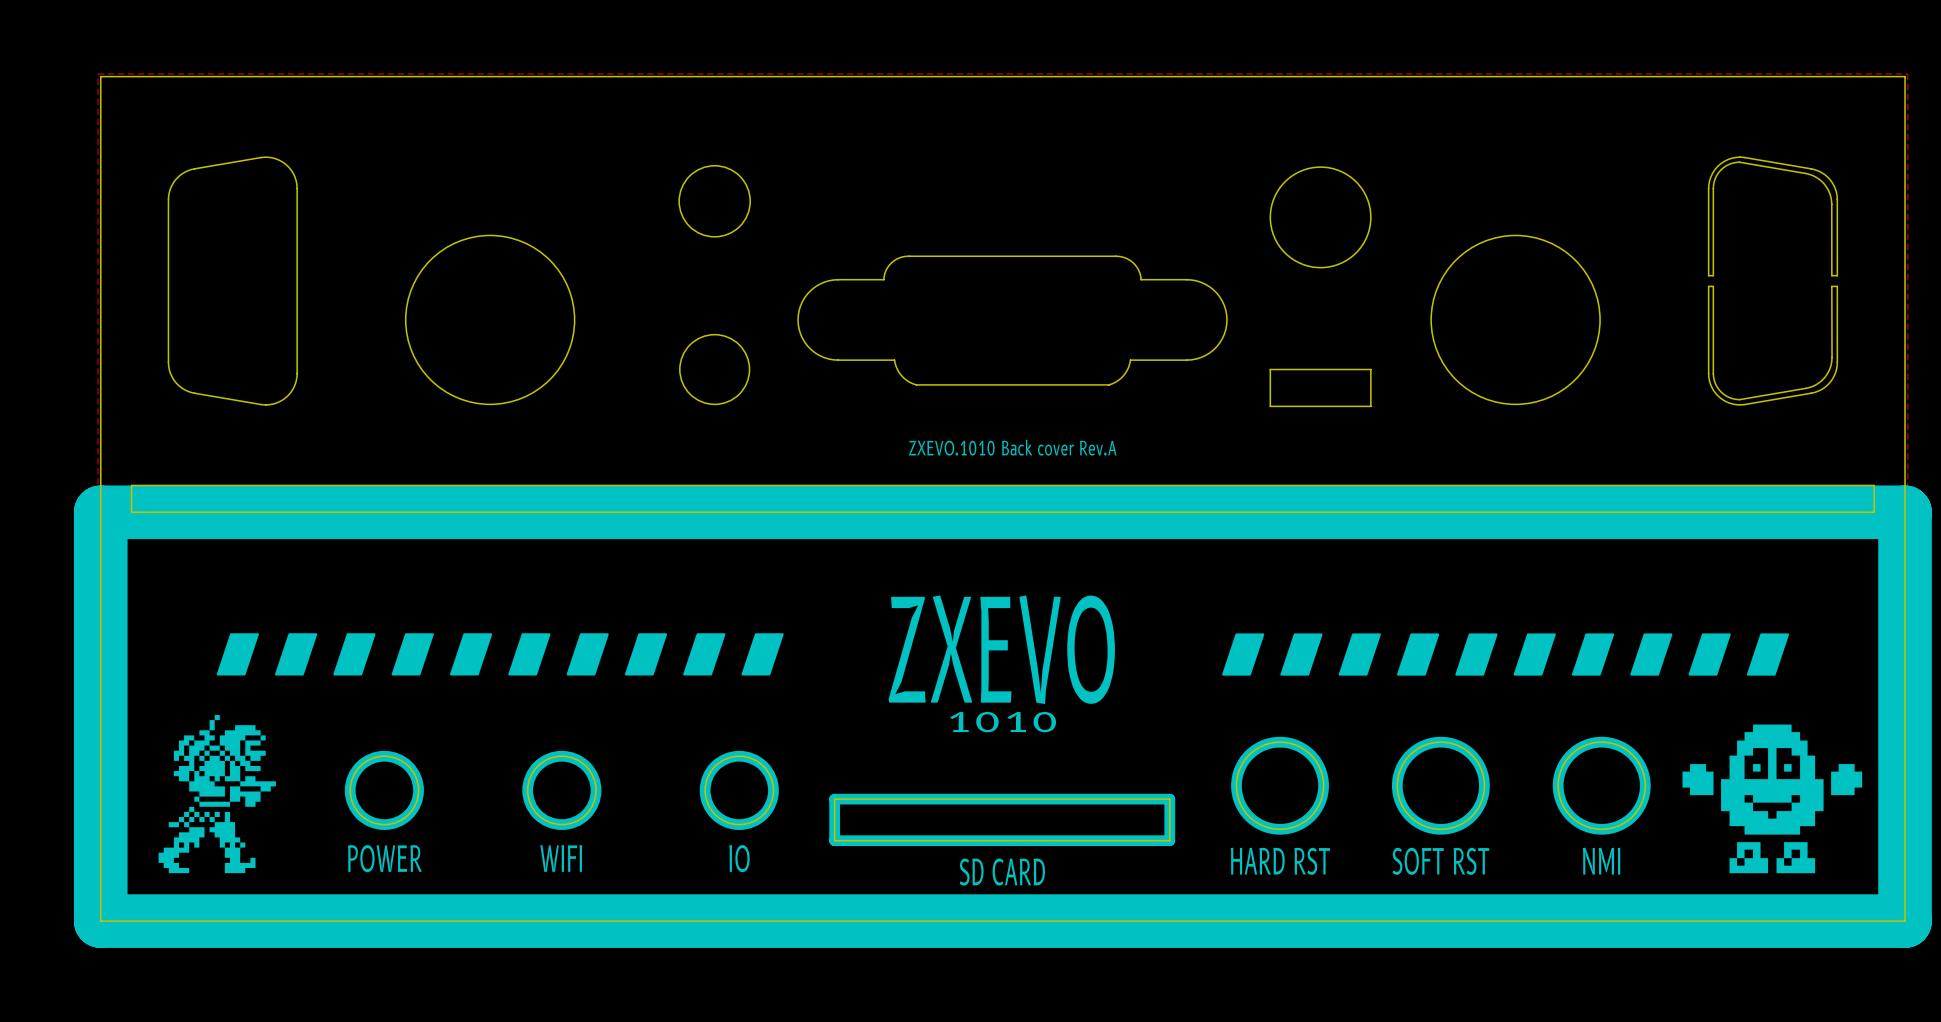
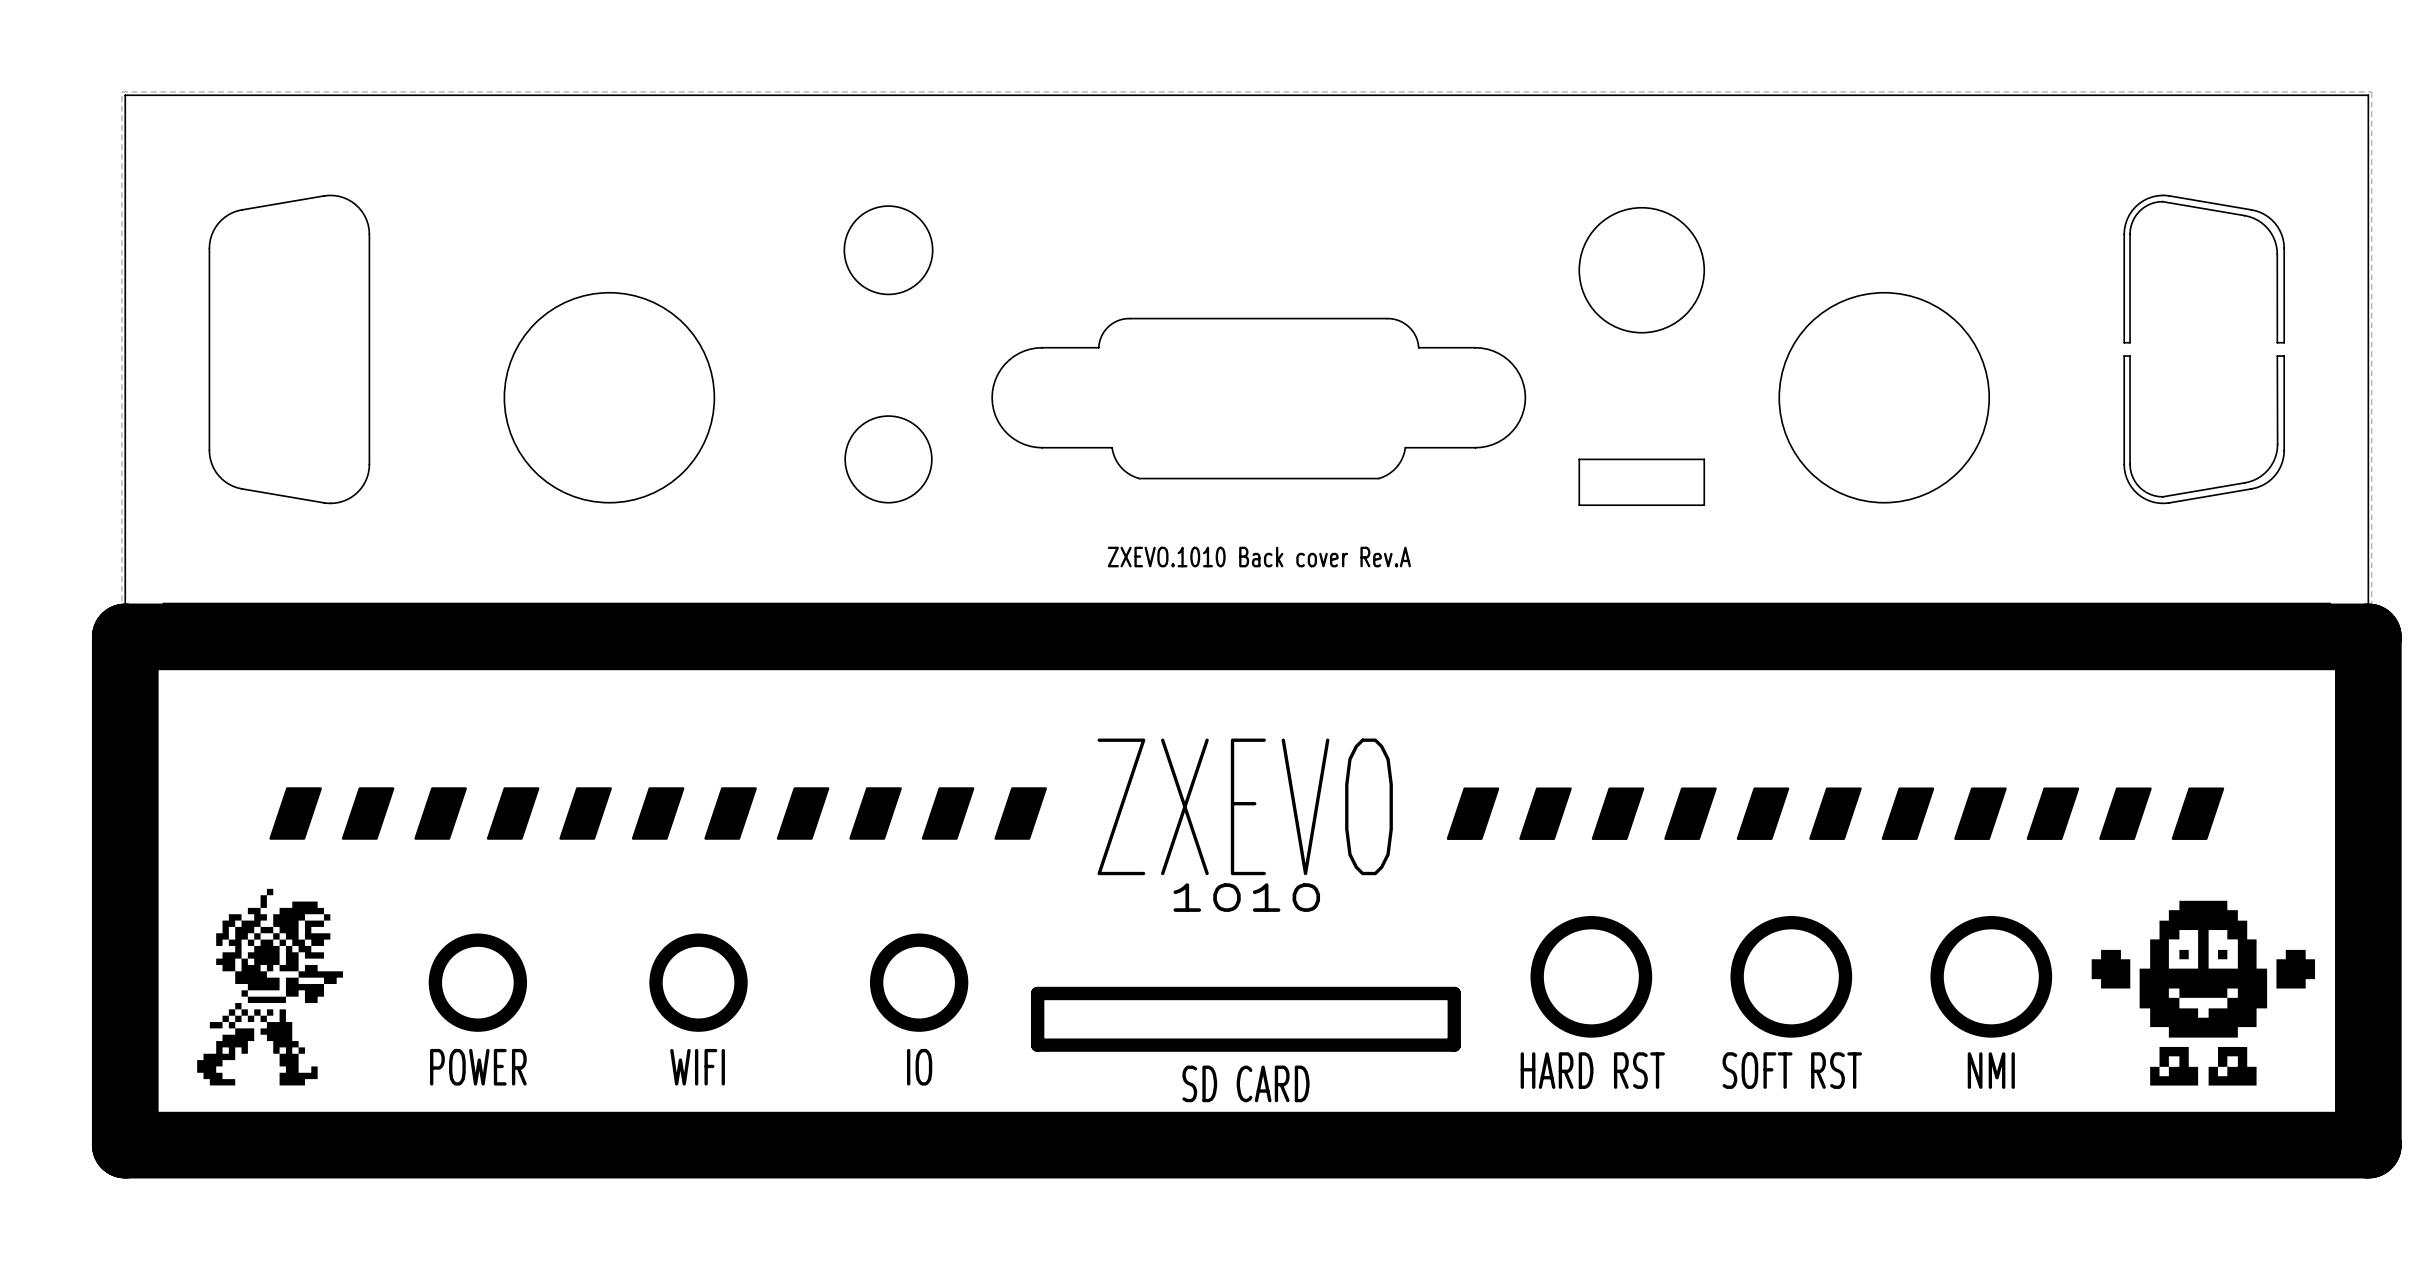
drawing: none -> [994, 787, 1047, 840]
drawing: none -> [1446, 787, 1500, 840]

